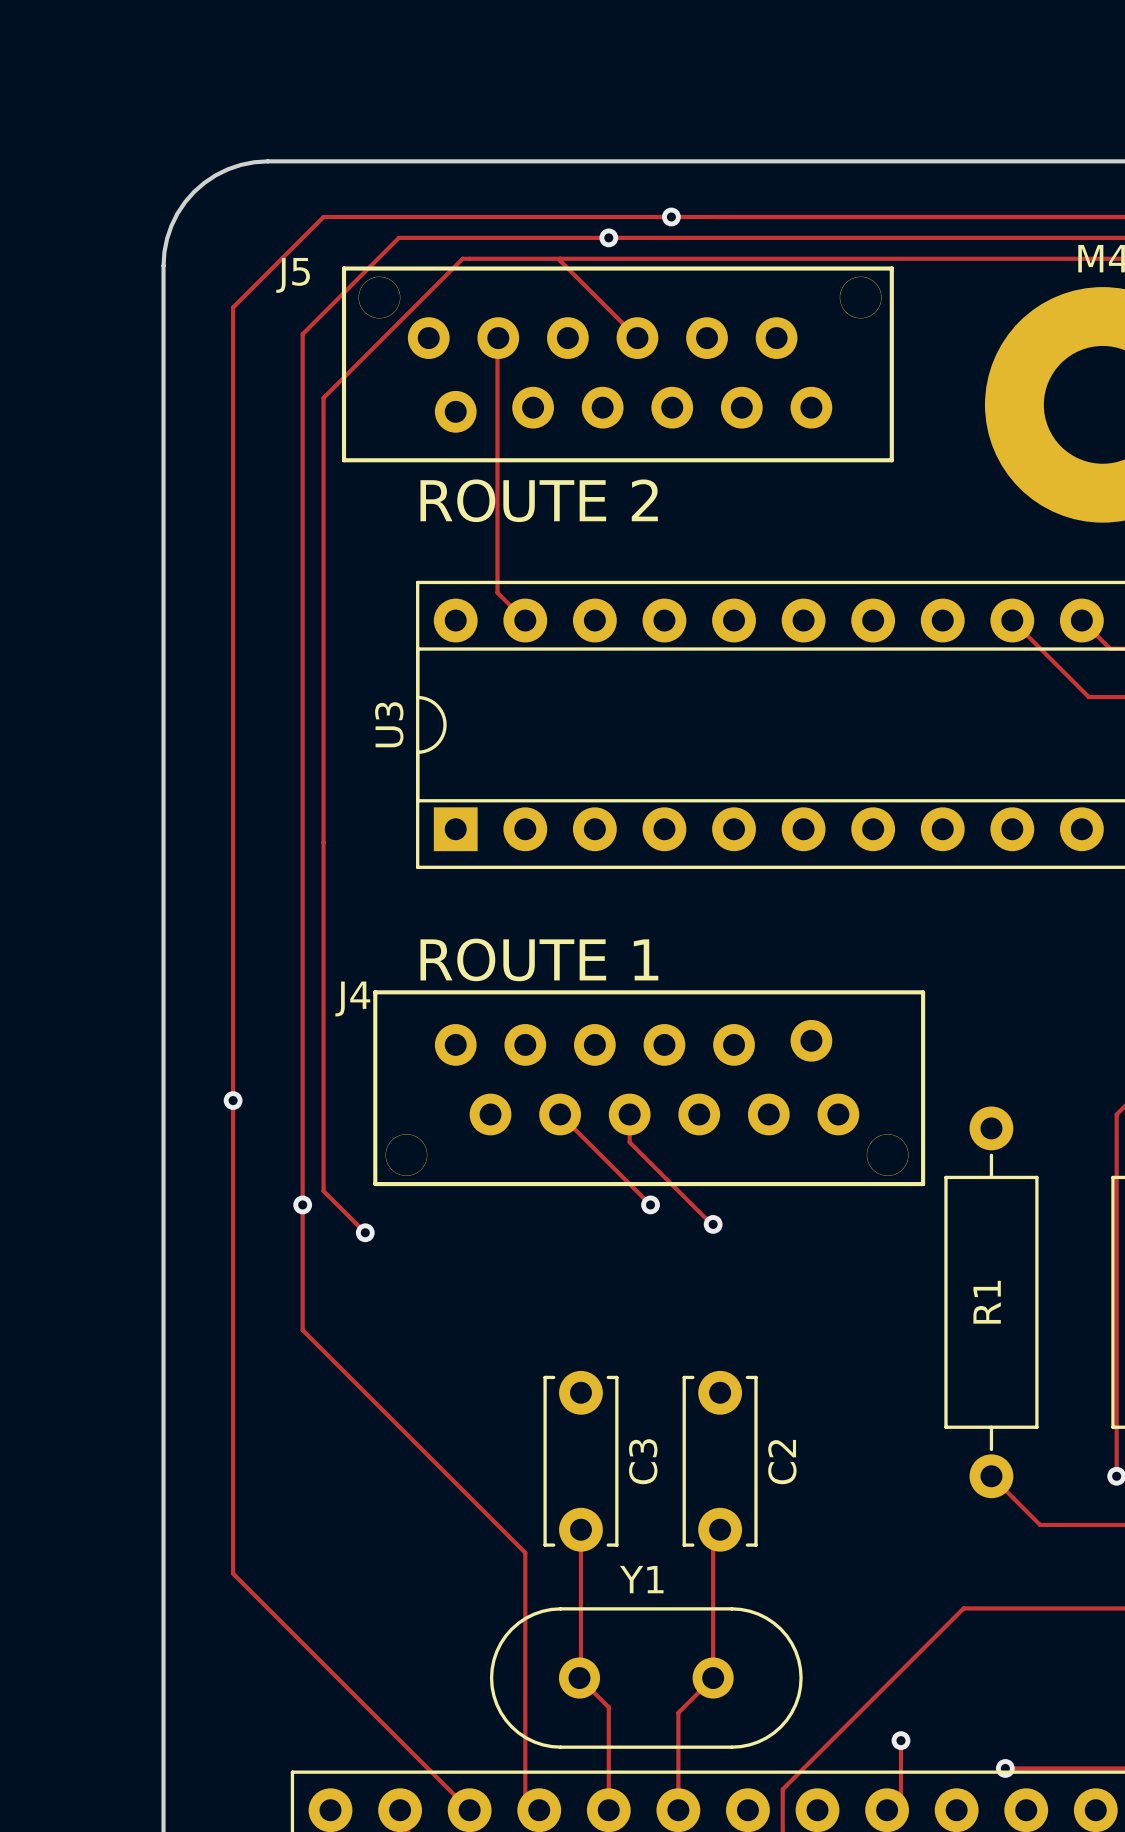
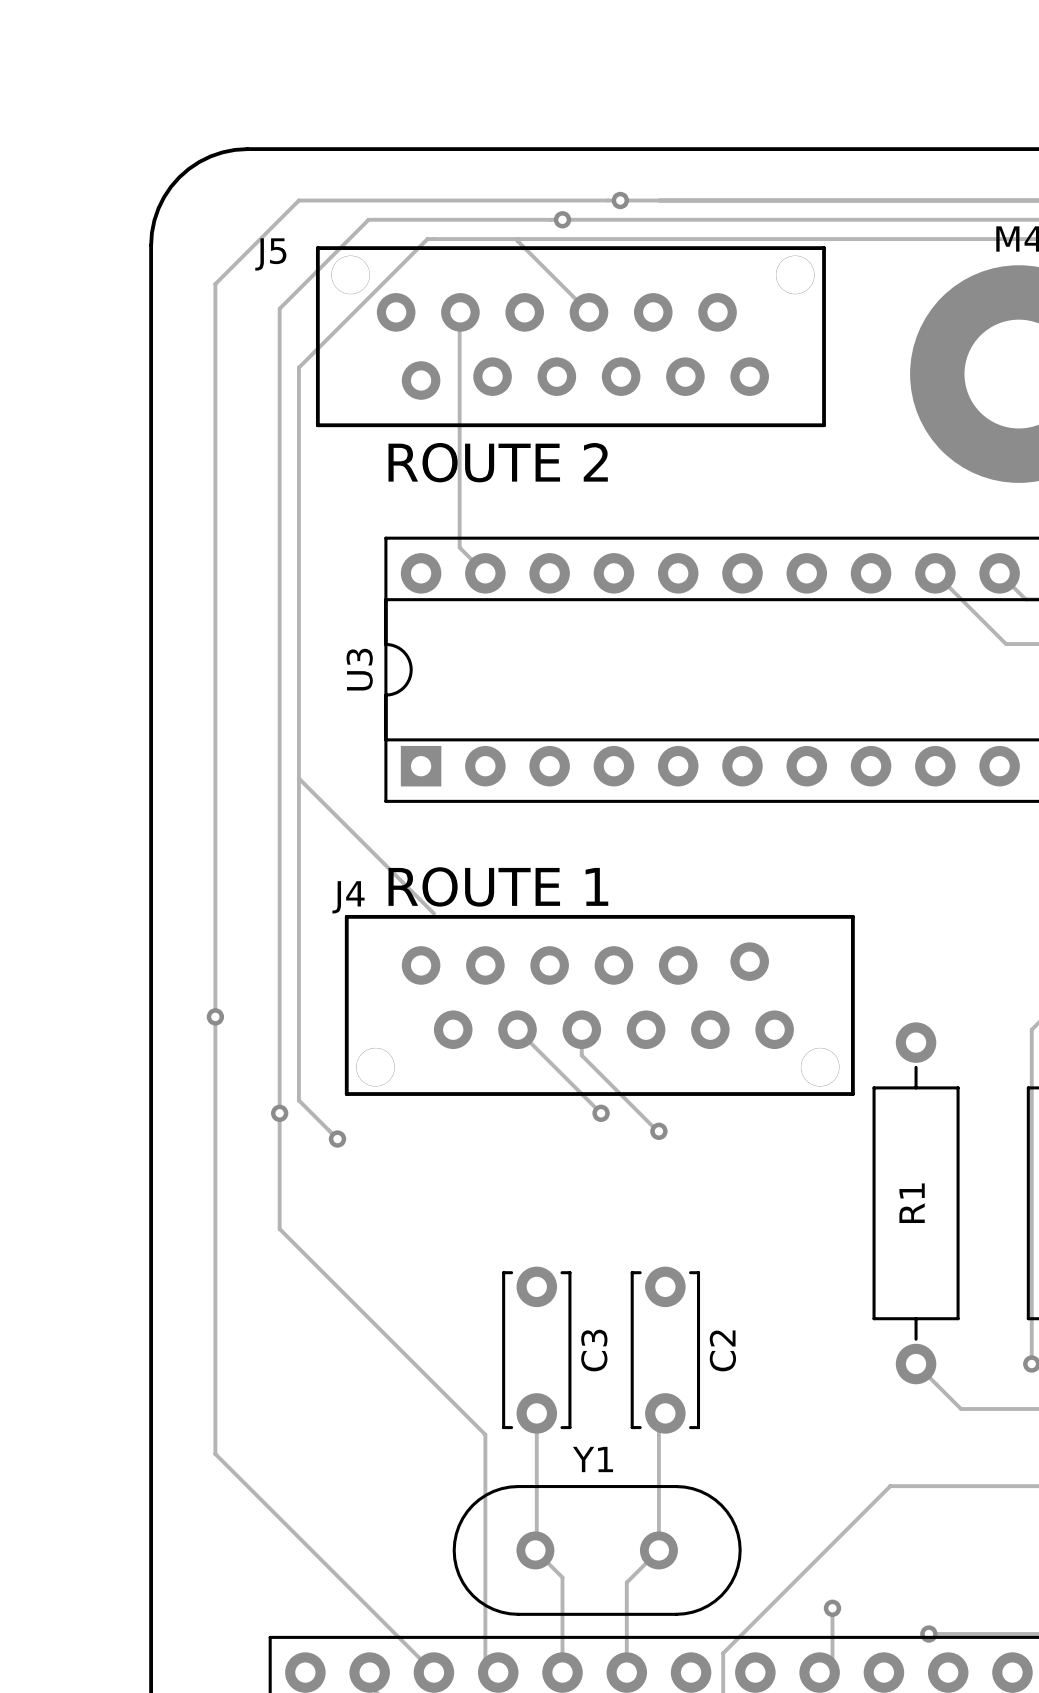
track: none -> (298, 778) (433, 913)
J4 name position: J4 (352, 998) -> J4 (348, 897)

